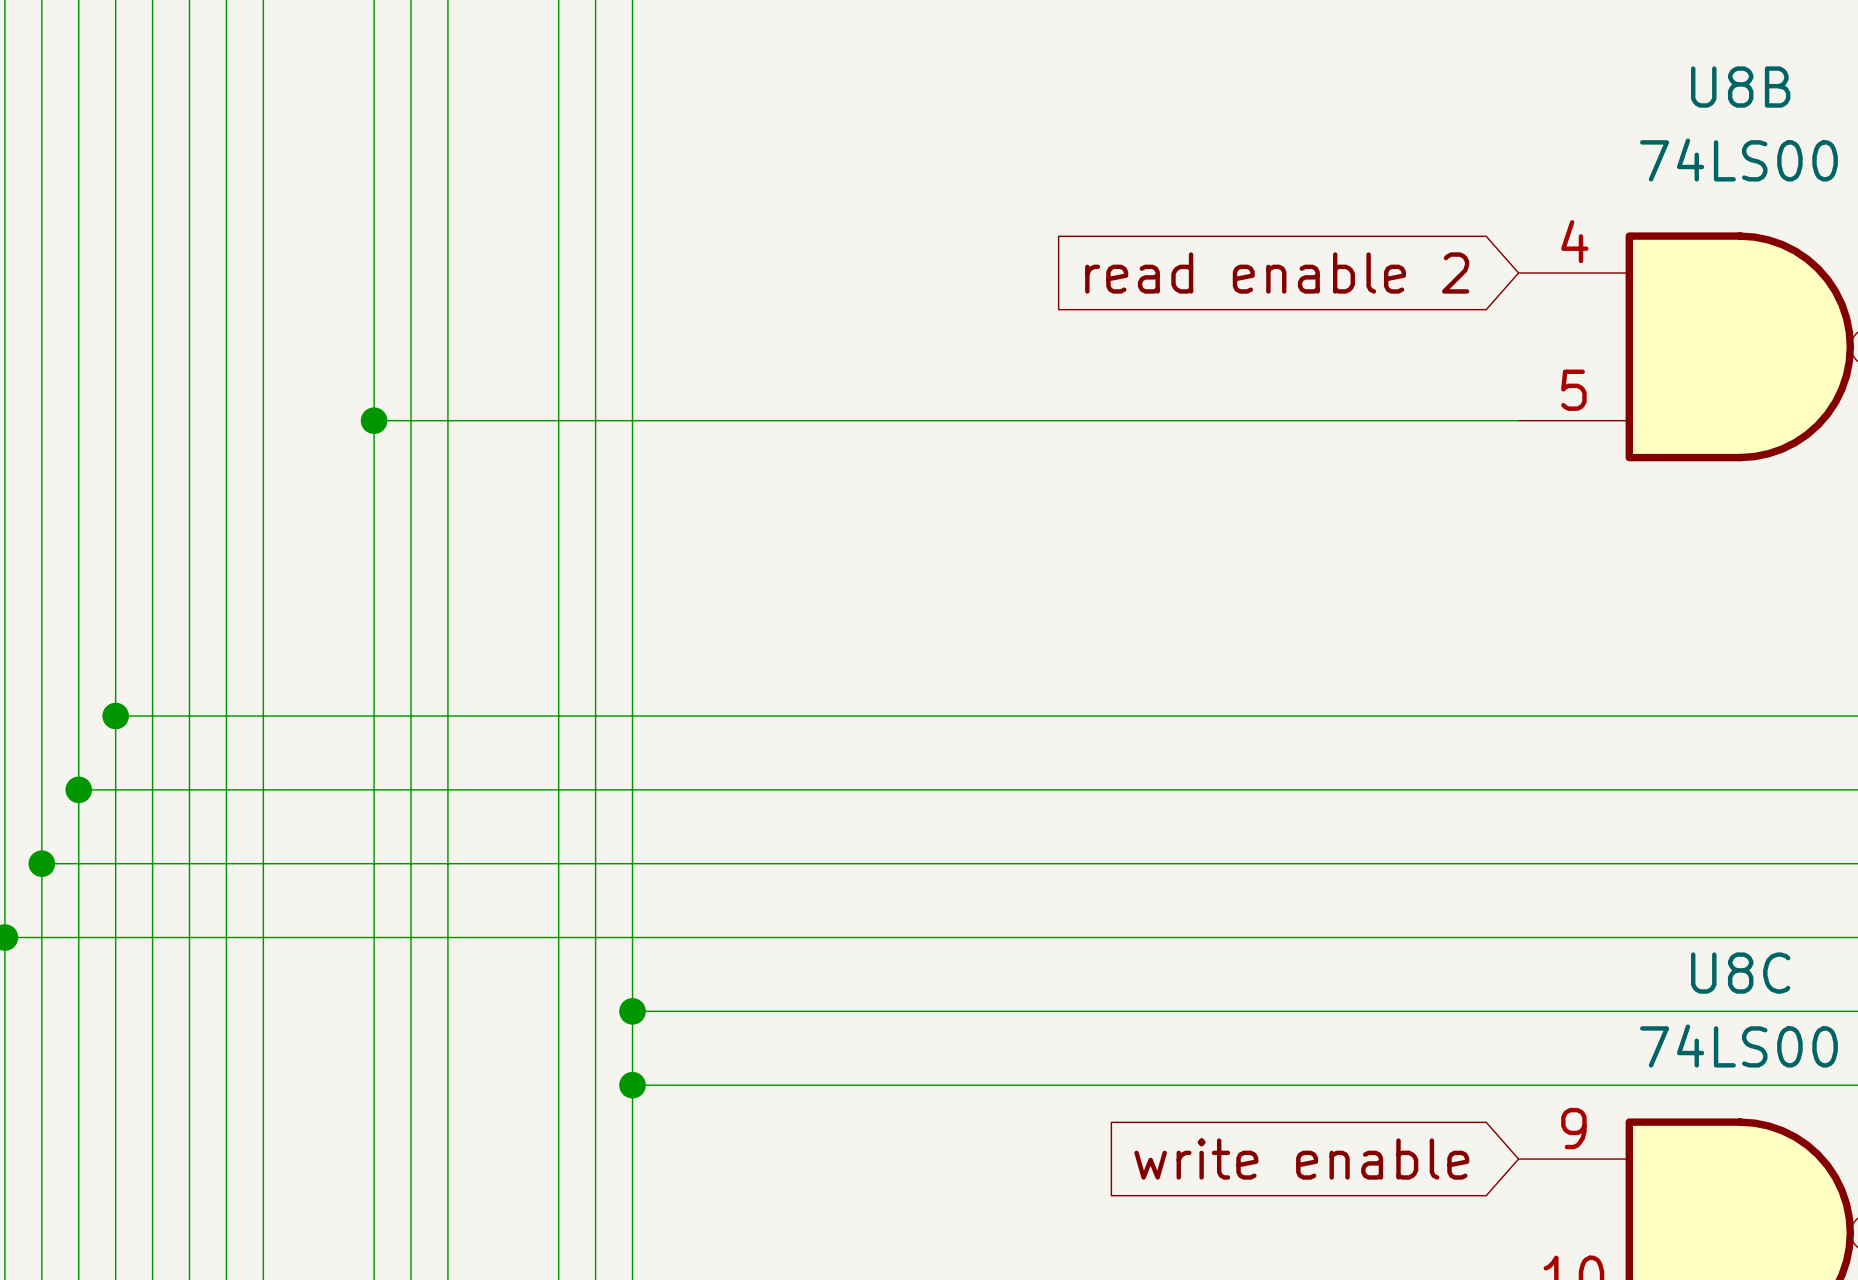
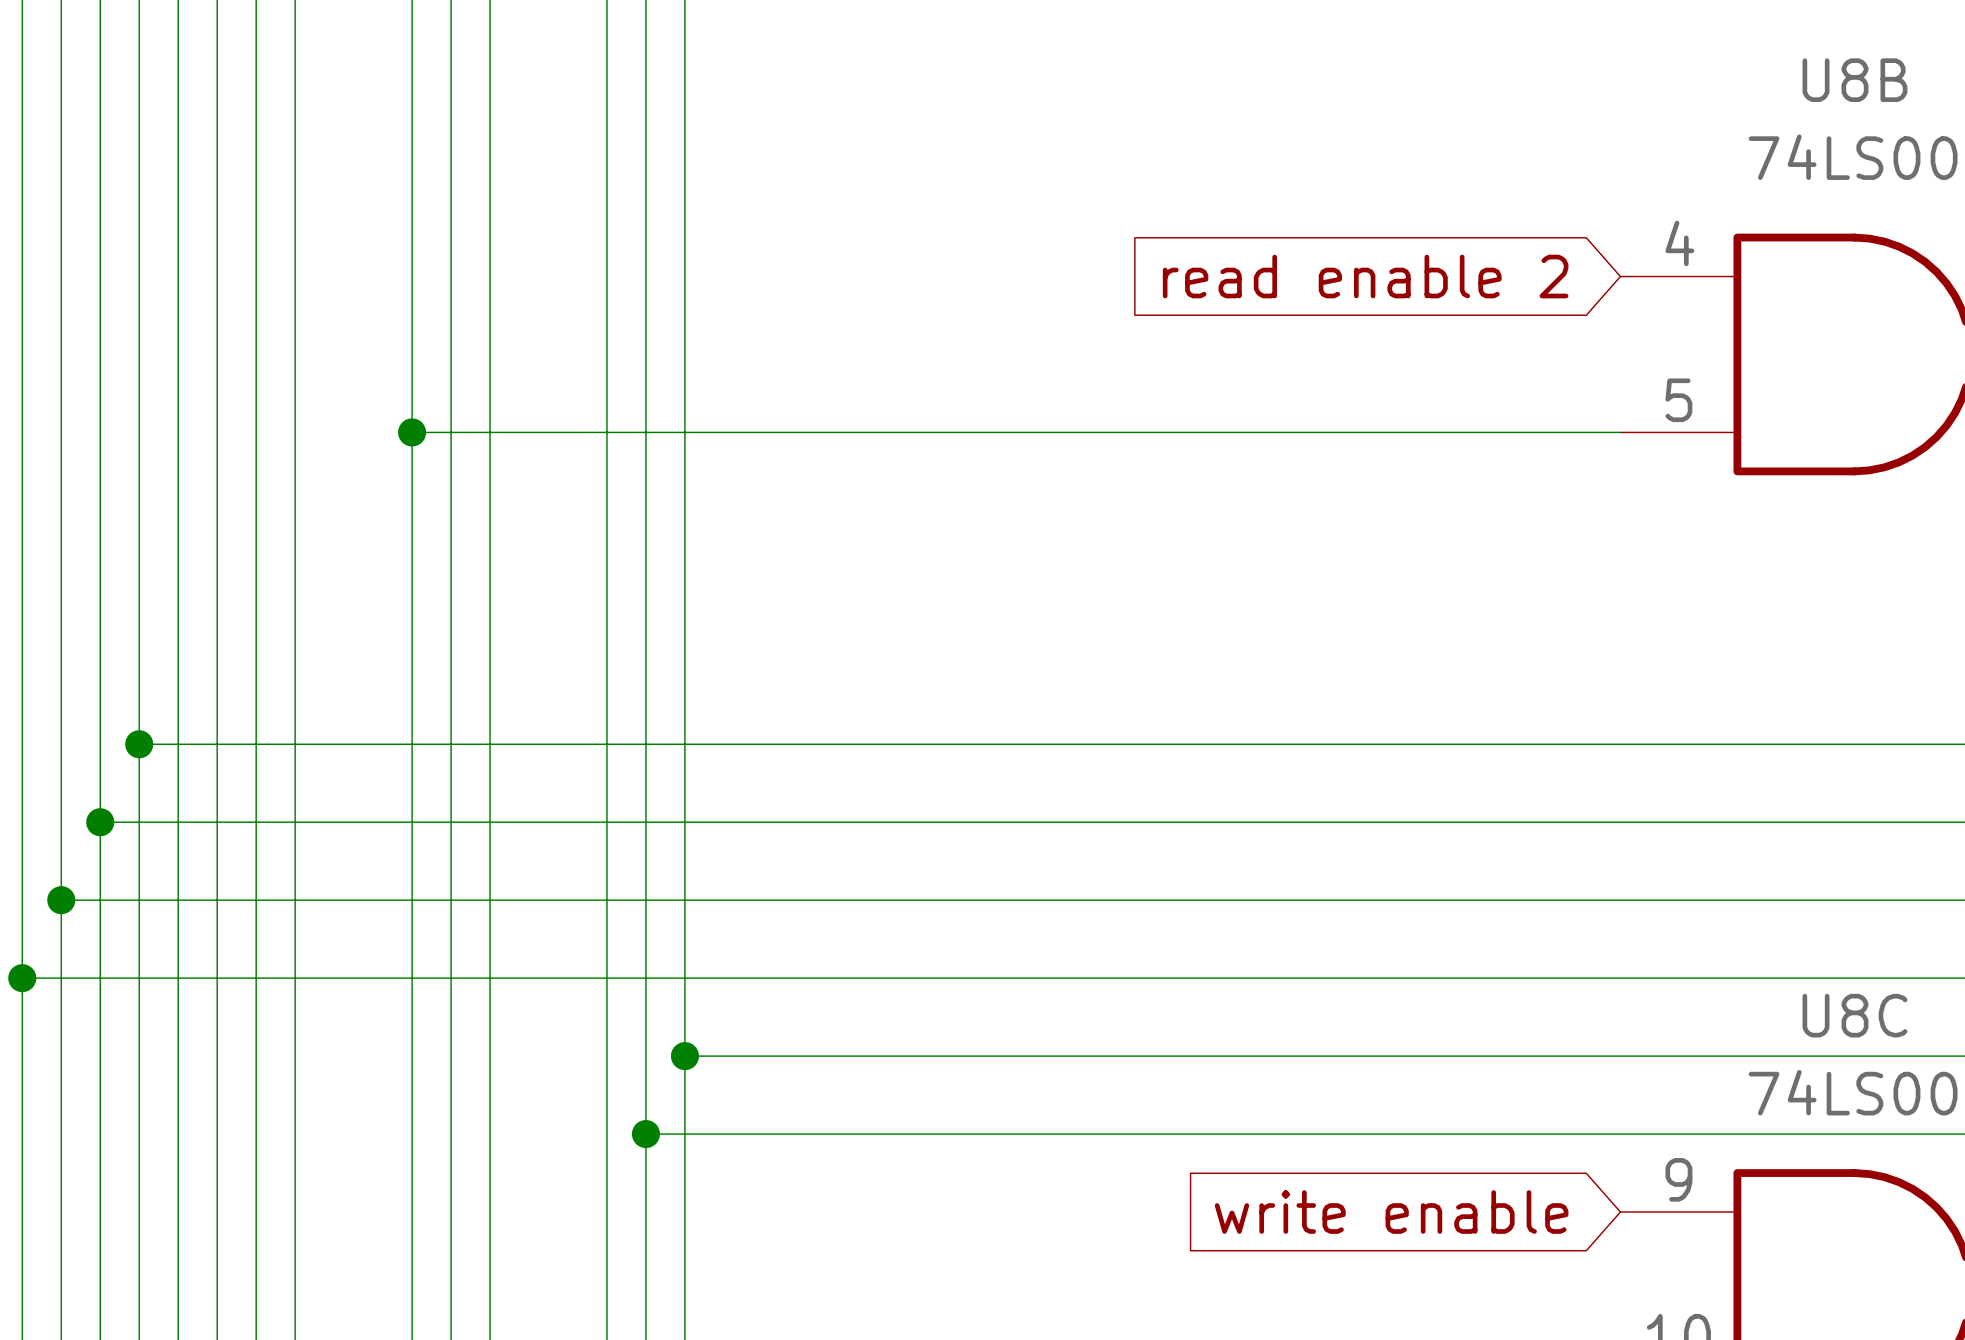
wire: none -> (645, 1134) (684, 1134)
junction position: (632, 1085) -> (645, 1134)

